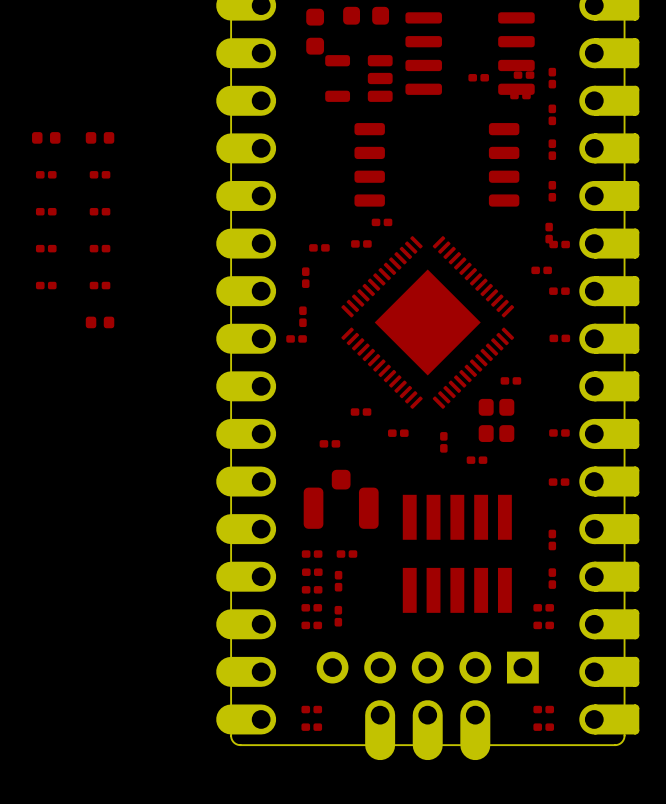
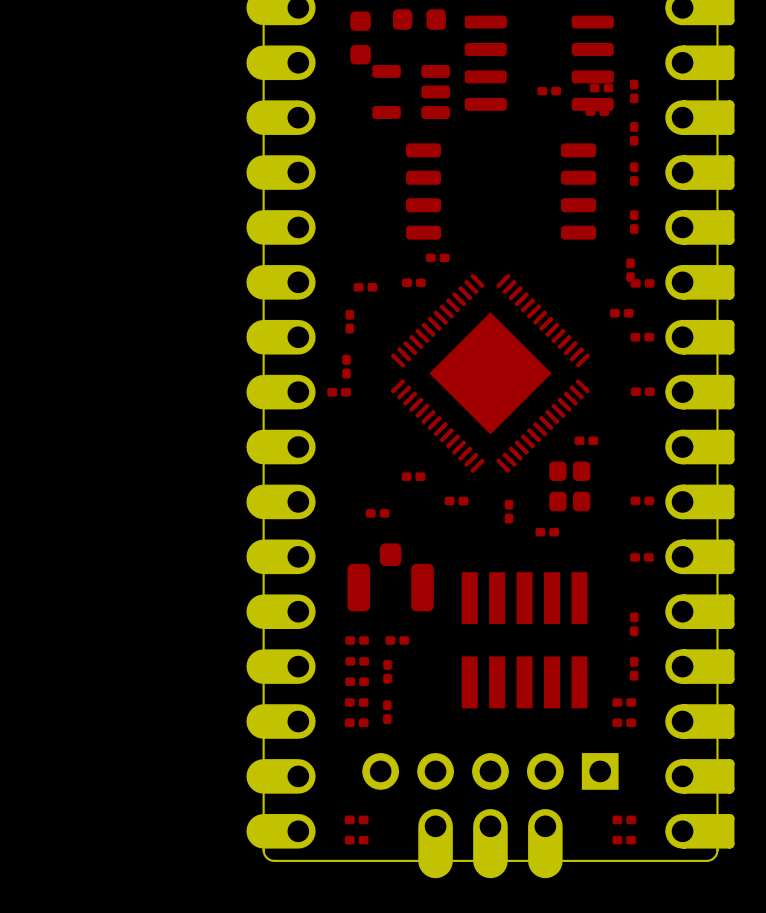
part: (46, 137) -> none
part: (100, 137) -> none
part: (46, 174) -> none
part: (100, 174) -> none
part: (46, 211) -> none
part: (100, 211) -> none
part: (46, 248) -> none
part: (100, 248) -> none
part: (46, 285) -> none
part: (100, 285) -> none
part: (100, 322) -> none

